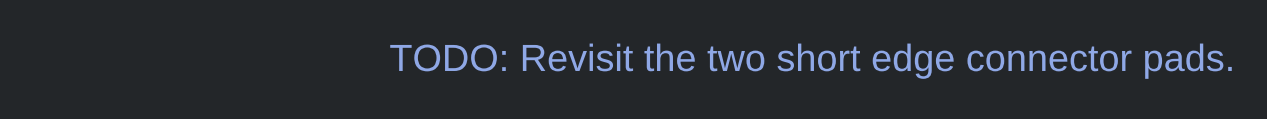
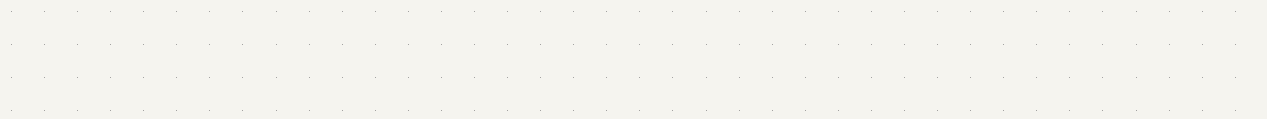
text: TODO: Revisit the two short edge connector pads. (811, 61) -> none

